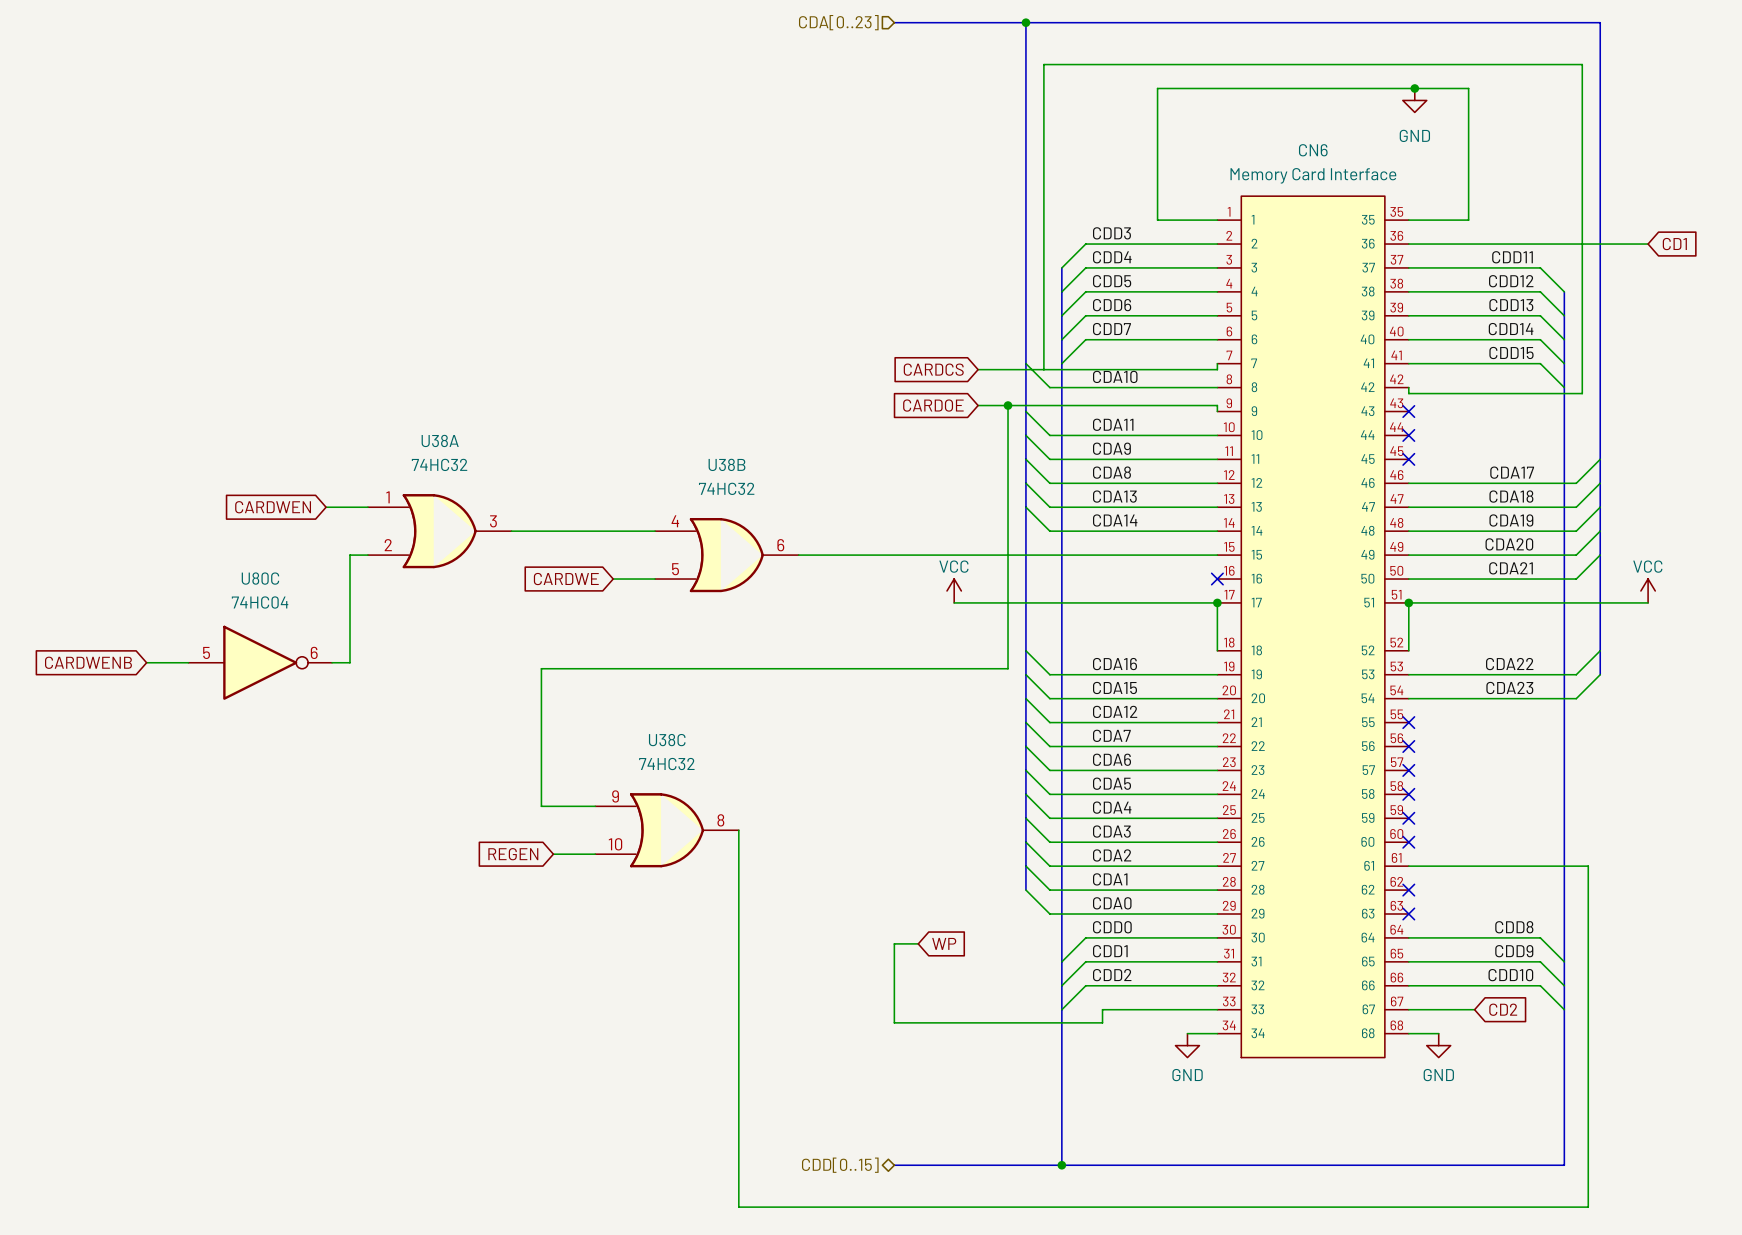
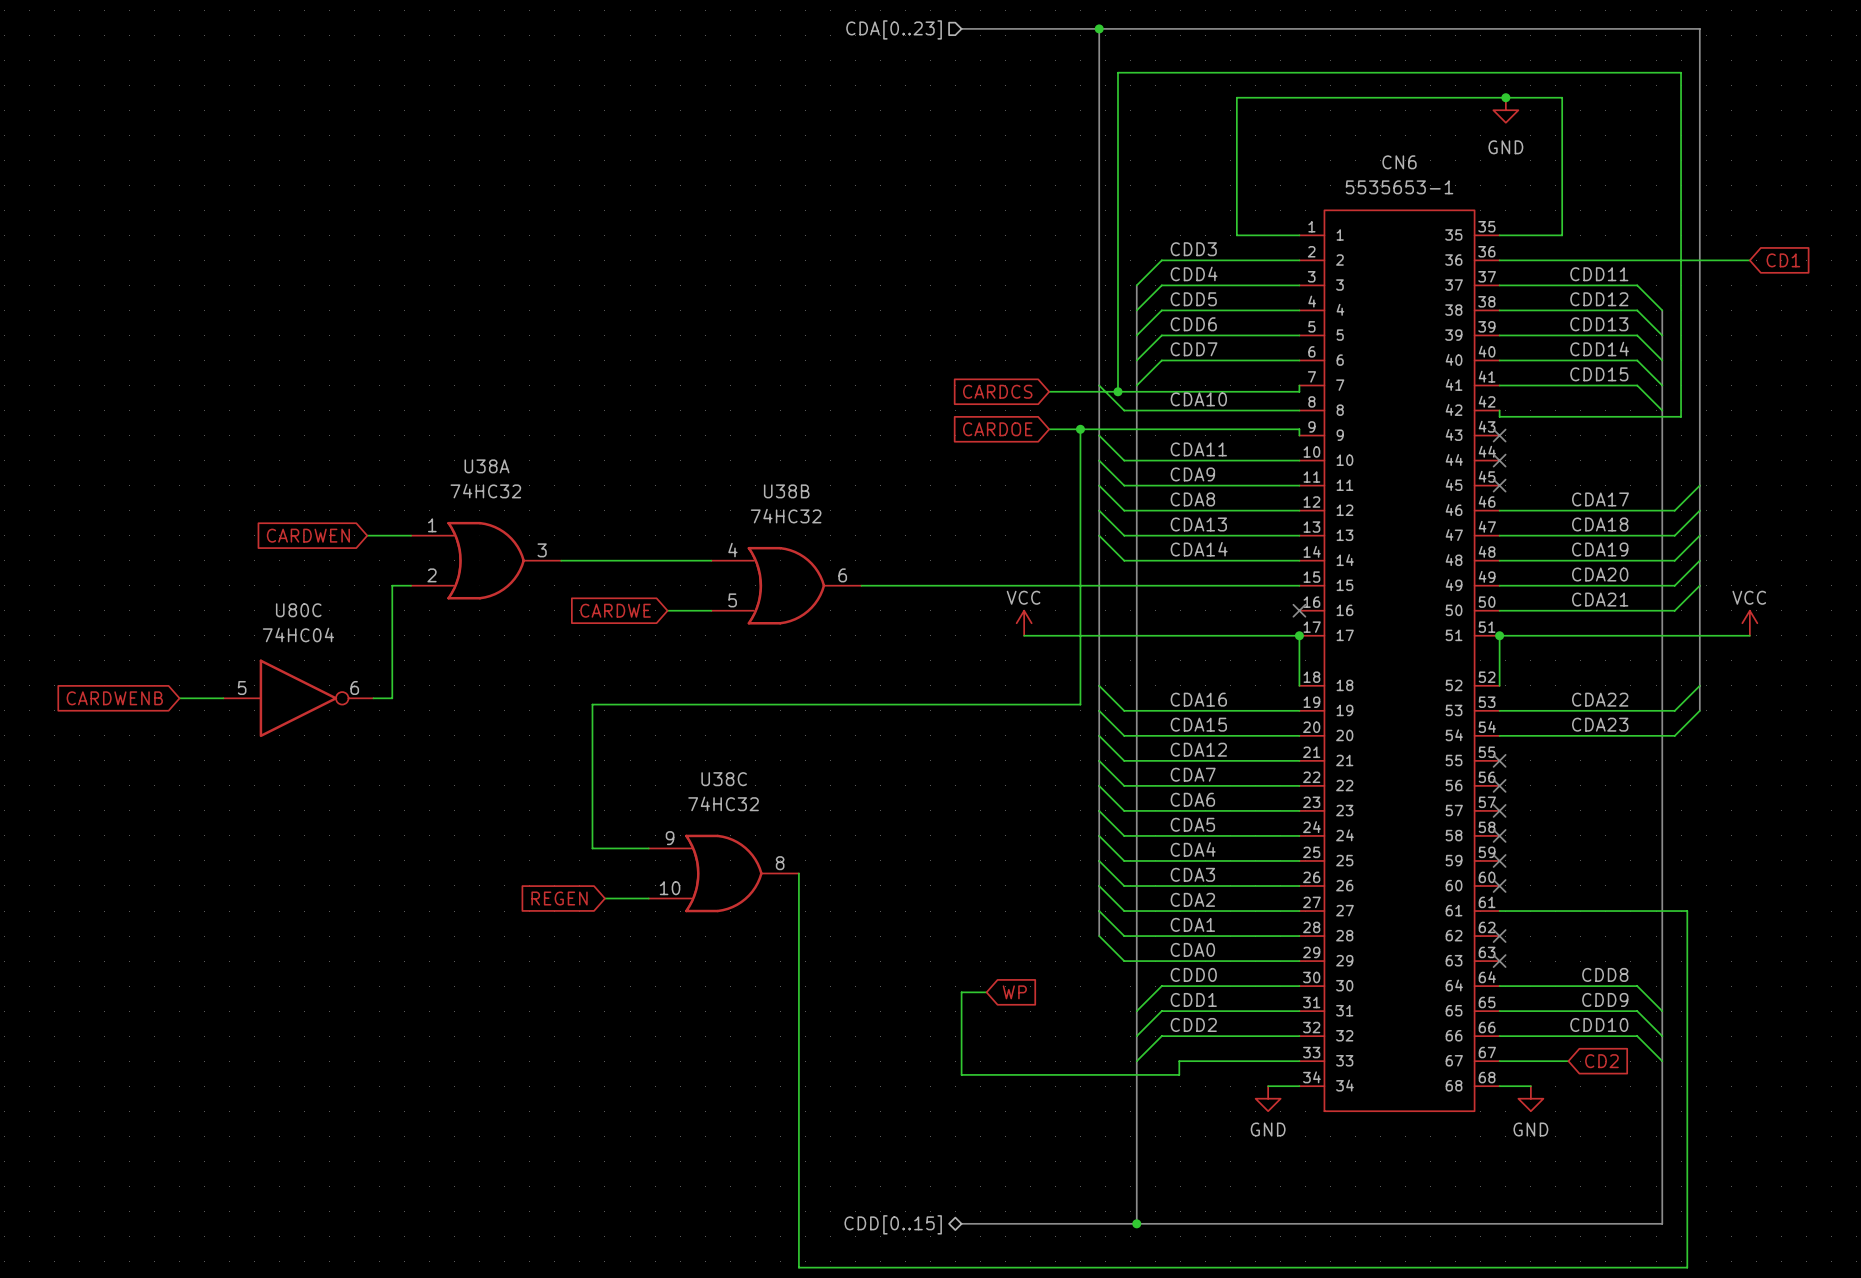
CN6 value: Memory Card Interface (1313, 175) -> 5535653-1 (1399, 187)
junction: none -> (1117, 391)

